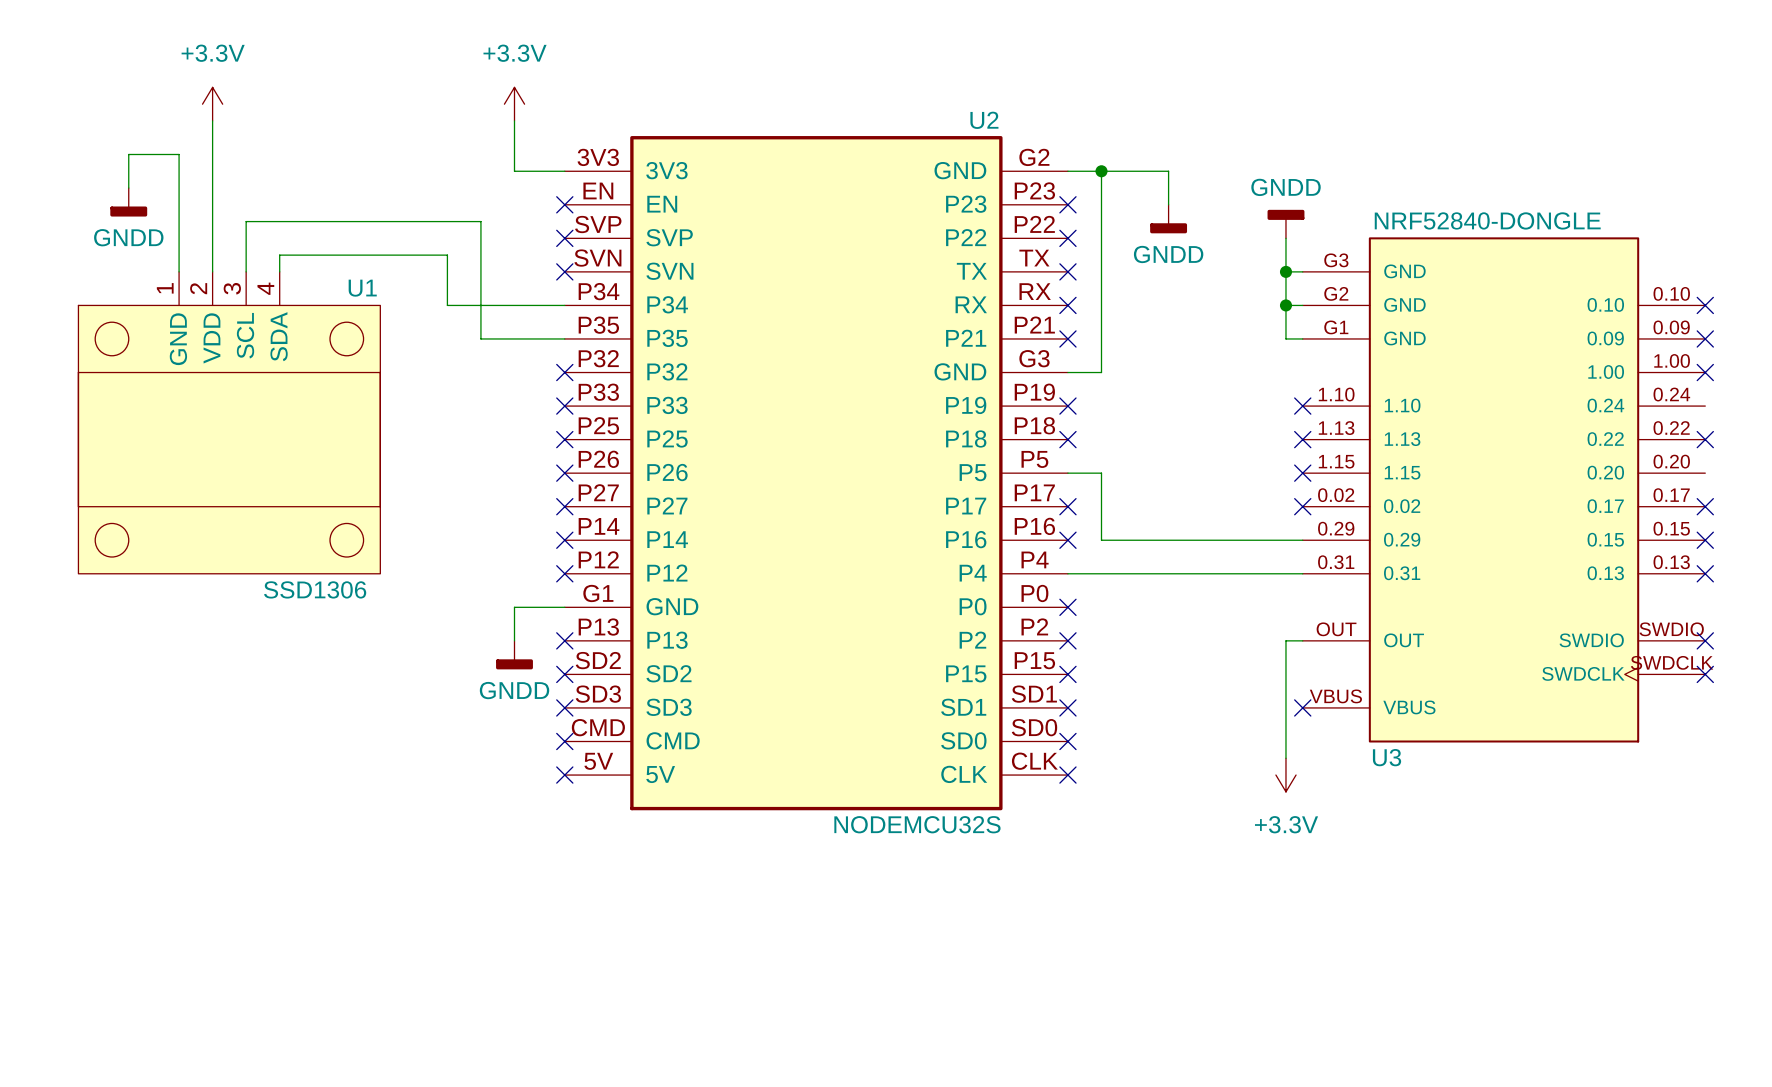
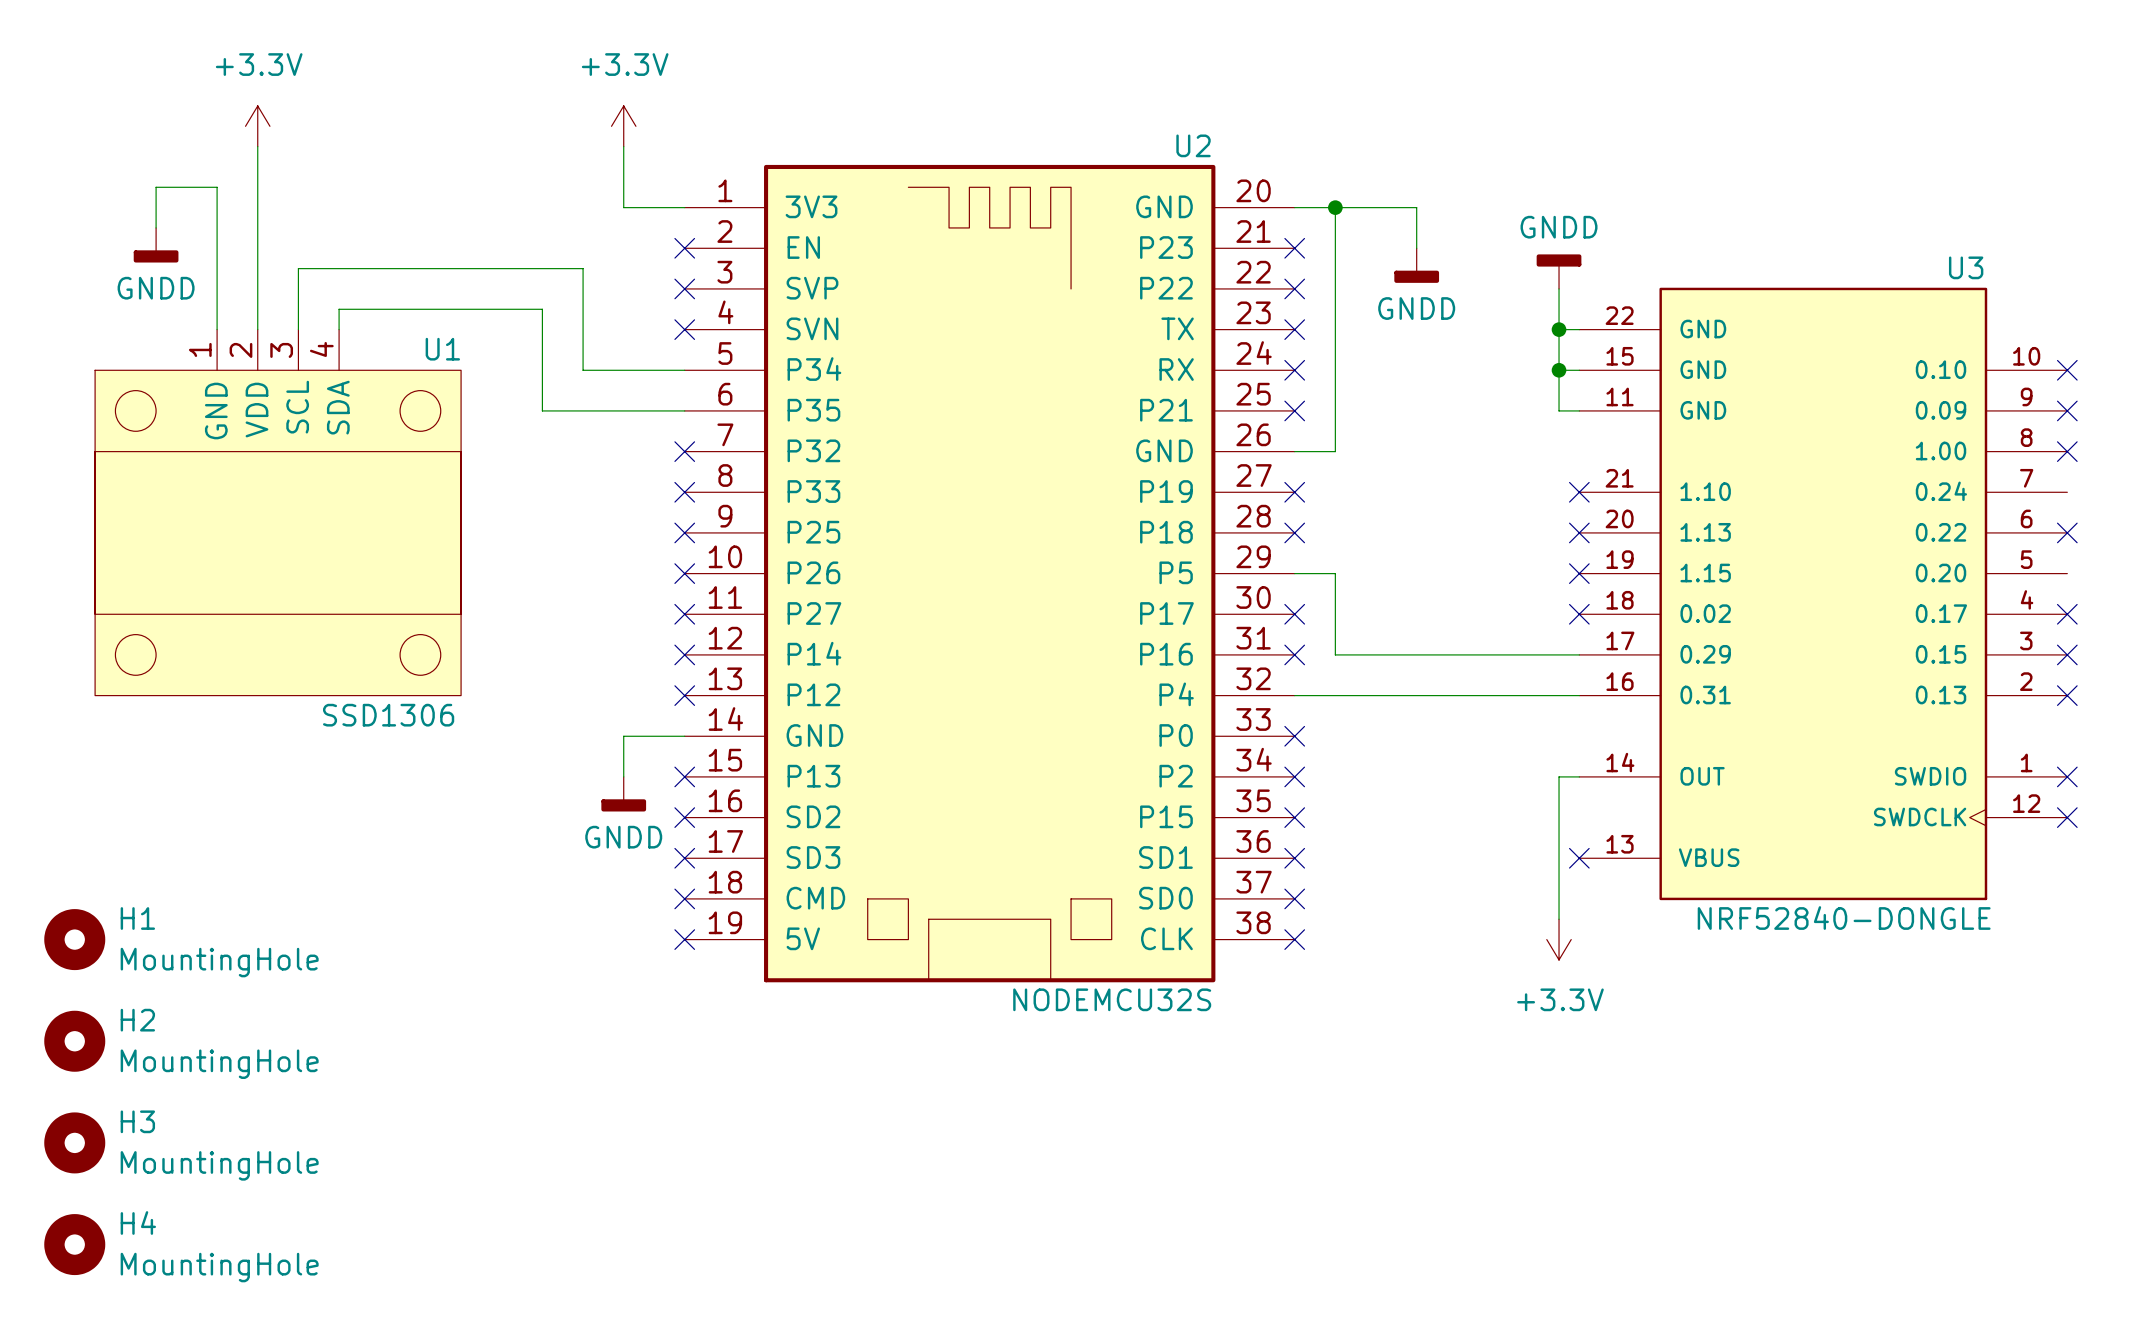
U2 symbol: [564, 136, 1068, 811] -> [684, 164, 1295, 983]
U3 value position: NRF52840-DONGLE (1487, 220) -> NRF52840-DONGLE (1844, 918)
U3 symbol: [1302, 237, 1706, 743] -> [1579, 287, 2068, 901]
wire: (447, 305) (480, 305) (480, 338) -> (542, 370) (542, 410) (583, 410)
U3 name position: U3 (1387, 757) -> U3 (1966, 267)
H1: none -> MountingHole (74, 939)
H2: none -> MountingHole (74, 1041)
H3: none -> MountingHole (74, 1142)
H4: none -> MountingHole (74, 1244)

